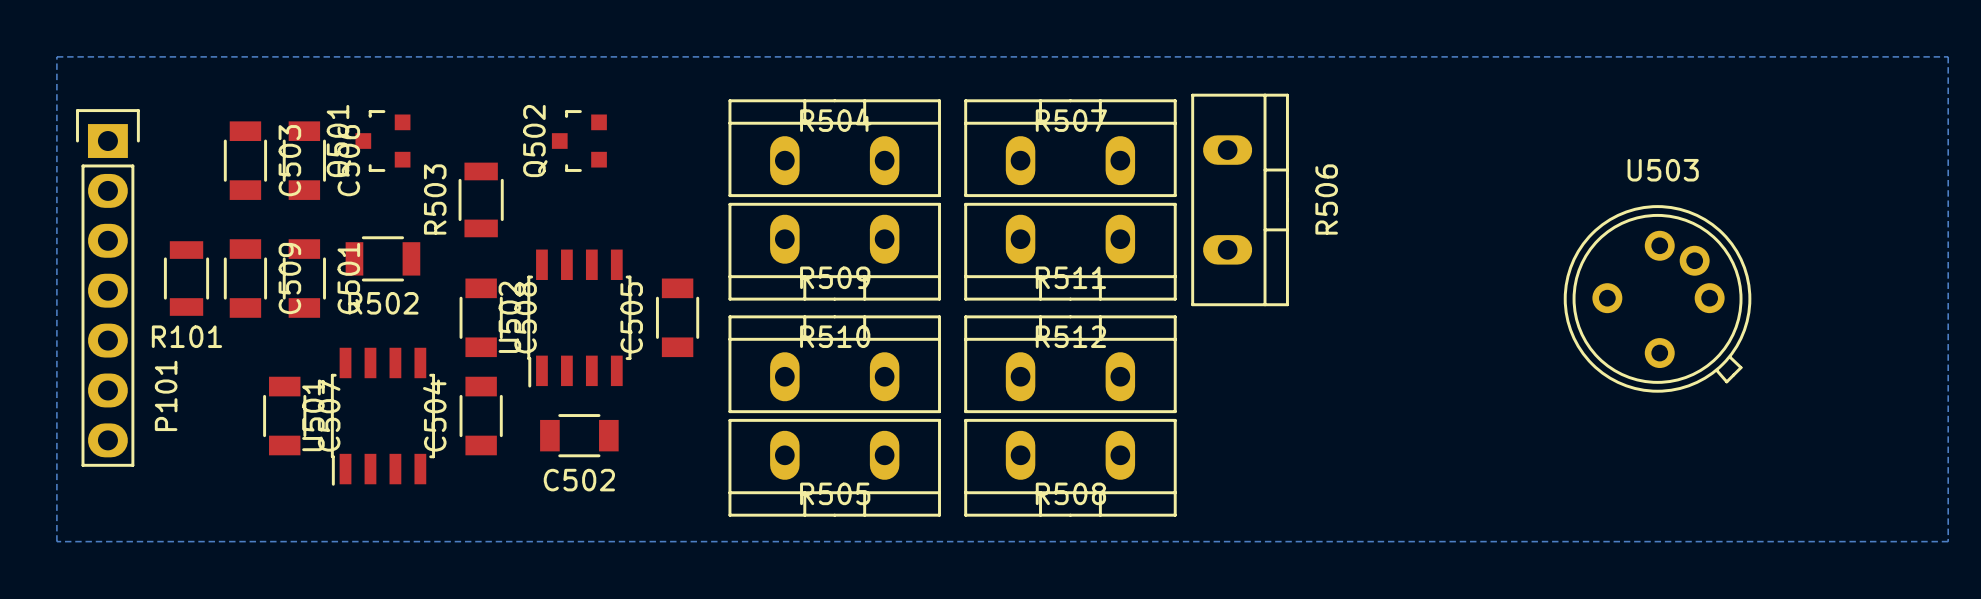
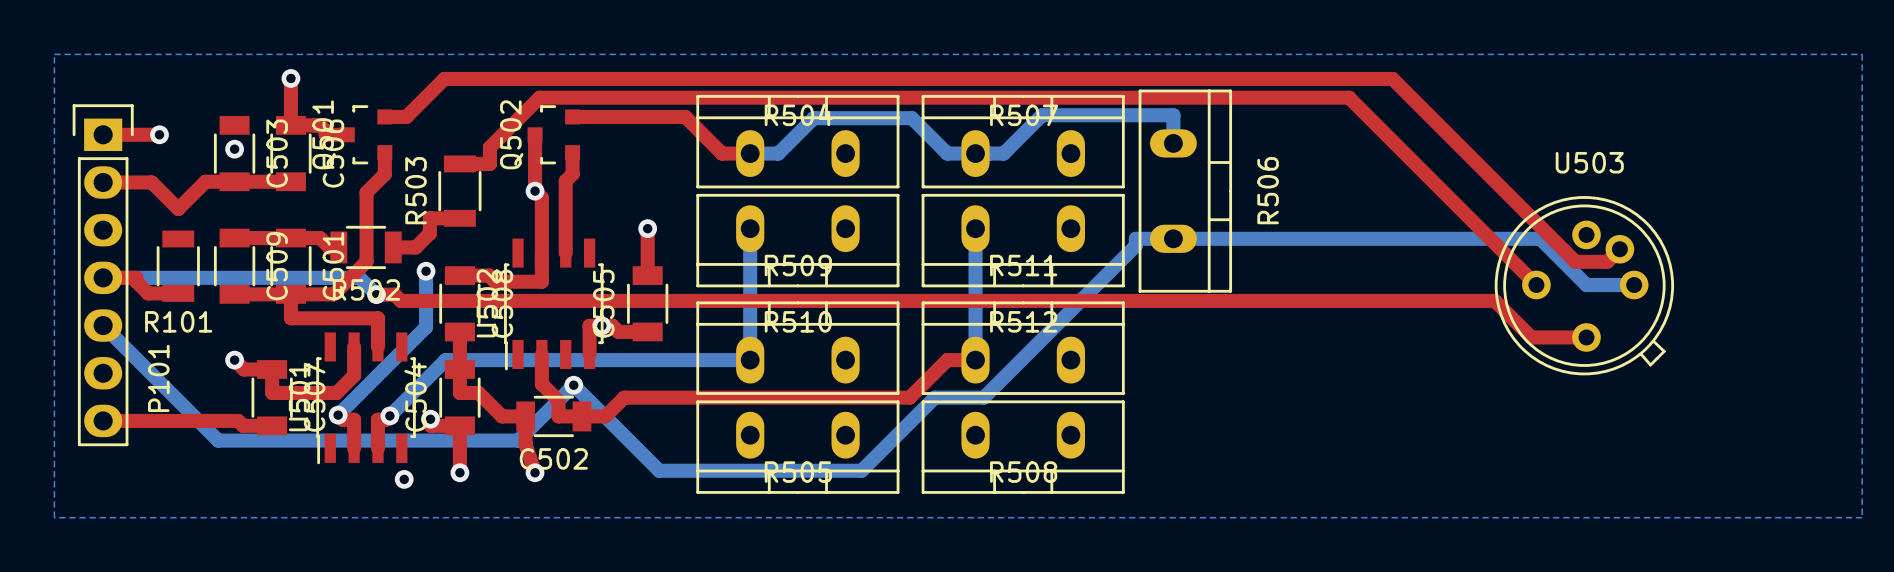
top track: none -> (290, 78) (290, 125) (320, 125) (325, 131) (325, 134) (347, 134)
via: none -> (290, 78)
top track: none -> (384, 116) (406, 116) (444, 78) (1392, 78) (1575, 261) (1607, 261) (1619, 249)
top track: none -> (572, 116) (685, 116) (722, 153) (750, 153)
top track: none -> (103, 134) (159, 134)
via: none -> (159, 134)
top track: none -> (535, 134) (535, 191) (541, 197) (541, 281) (495, 281) (489, 275) (459, 275)
bottom track: none -> (1173, 143) (1173, 115) (1042, 115) (1003, 153) (947, 153) (911, 118) (813, 118) (778, 153) (750, 153)
via: none -> (234, 149)
top track: none -> (384, 152) (384, 174) (366, 192) (366, 261) (333, 294) (234, 294)
top track: none -> (572, 152) (572, 174) (565, 181) (565, 253)
top track: none -> (459, 163) (489, 163) (489, 147) (539, 97) (1349, 97) (1536, 285)
top track: none -> (290, 181) (205, 181) (178, 208) (151, 182) (103, 182)
via: none -> (535, 191)
top track: none -> (459, 218) (429, 218) (429, 233) (415, 247) (393, 247)
top track: none -> (647, 228) (647, 275)
via: none -> (647, 228)
bottom track: none -> (750, 228) (750, 360) (445, 360) (389, 415)
bottom track: none -> (975, 228) (975, 360)
top track: none -> (234, 238) (320, 238) (329, 247) (338, 247)
bottom track: none -> (426, 271) (426, 327) (338, 415)
via: none -> (426, 271)
top track: none -> (103, 277) (136, 277) (136, 281) (148, 293) (178, 293)
bottom track: none -> (103, 277) (359, 277) (376, 294)
bottom track: none -> (1634, 285) (1586, 285) (1540, 238) (1135, 238) (1135, 245) (983, 397) (934, 397) (861, 470) (659, 470) (573, 385) (518, 440) (218, 440) (103, 325)
top track: none -> (290, 294) (291, 318) (377, 318) (377, 346)
top track: none -> (376, 294) (394, 294) (400, 300) (1494, 300) (1531, 337) (1586, 337)
via: none -> (376, 294)
via: none -> (601, 325)
top track: none -> (459, 331) (459, 392) (478, 392) (502, 416) (525, 416) (525, 444) (535, 472)
top track: none -> (647, 331) (618, 331) (612, 325) (589, 325) (589, 354)
top track: none -> (354, 346) (354, 375) (336, 392) (272, 392) (272, 369) (243, 369) (234, 360)
top track: none -> (541, 354) (541, 384) (558, 400) (558, 416) (605, 416) (624, 397) (909, 397) (947, 360) (975, 360)
via: none -> (234, 360)
via: none -> (573, 385)
top track: none -> (338, 415) (342, 419) (354, 419) (354, 448)
via: none -> (338, 415)
top track: none -> (389, 415) (386, 419) (377, 419) (377, 448)
via: none -> (389, 415)
top track: none -> (430, 419) (430, 425) (459, 425) (459, 472)
via: none -> (430, 419)
top track: none -> (103, 420) (238, 420) (243, 425) (272, 425)
via: none -> (459, 472)
via: none -> (535, 472)
via: none -> (404, 479)

